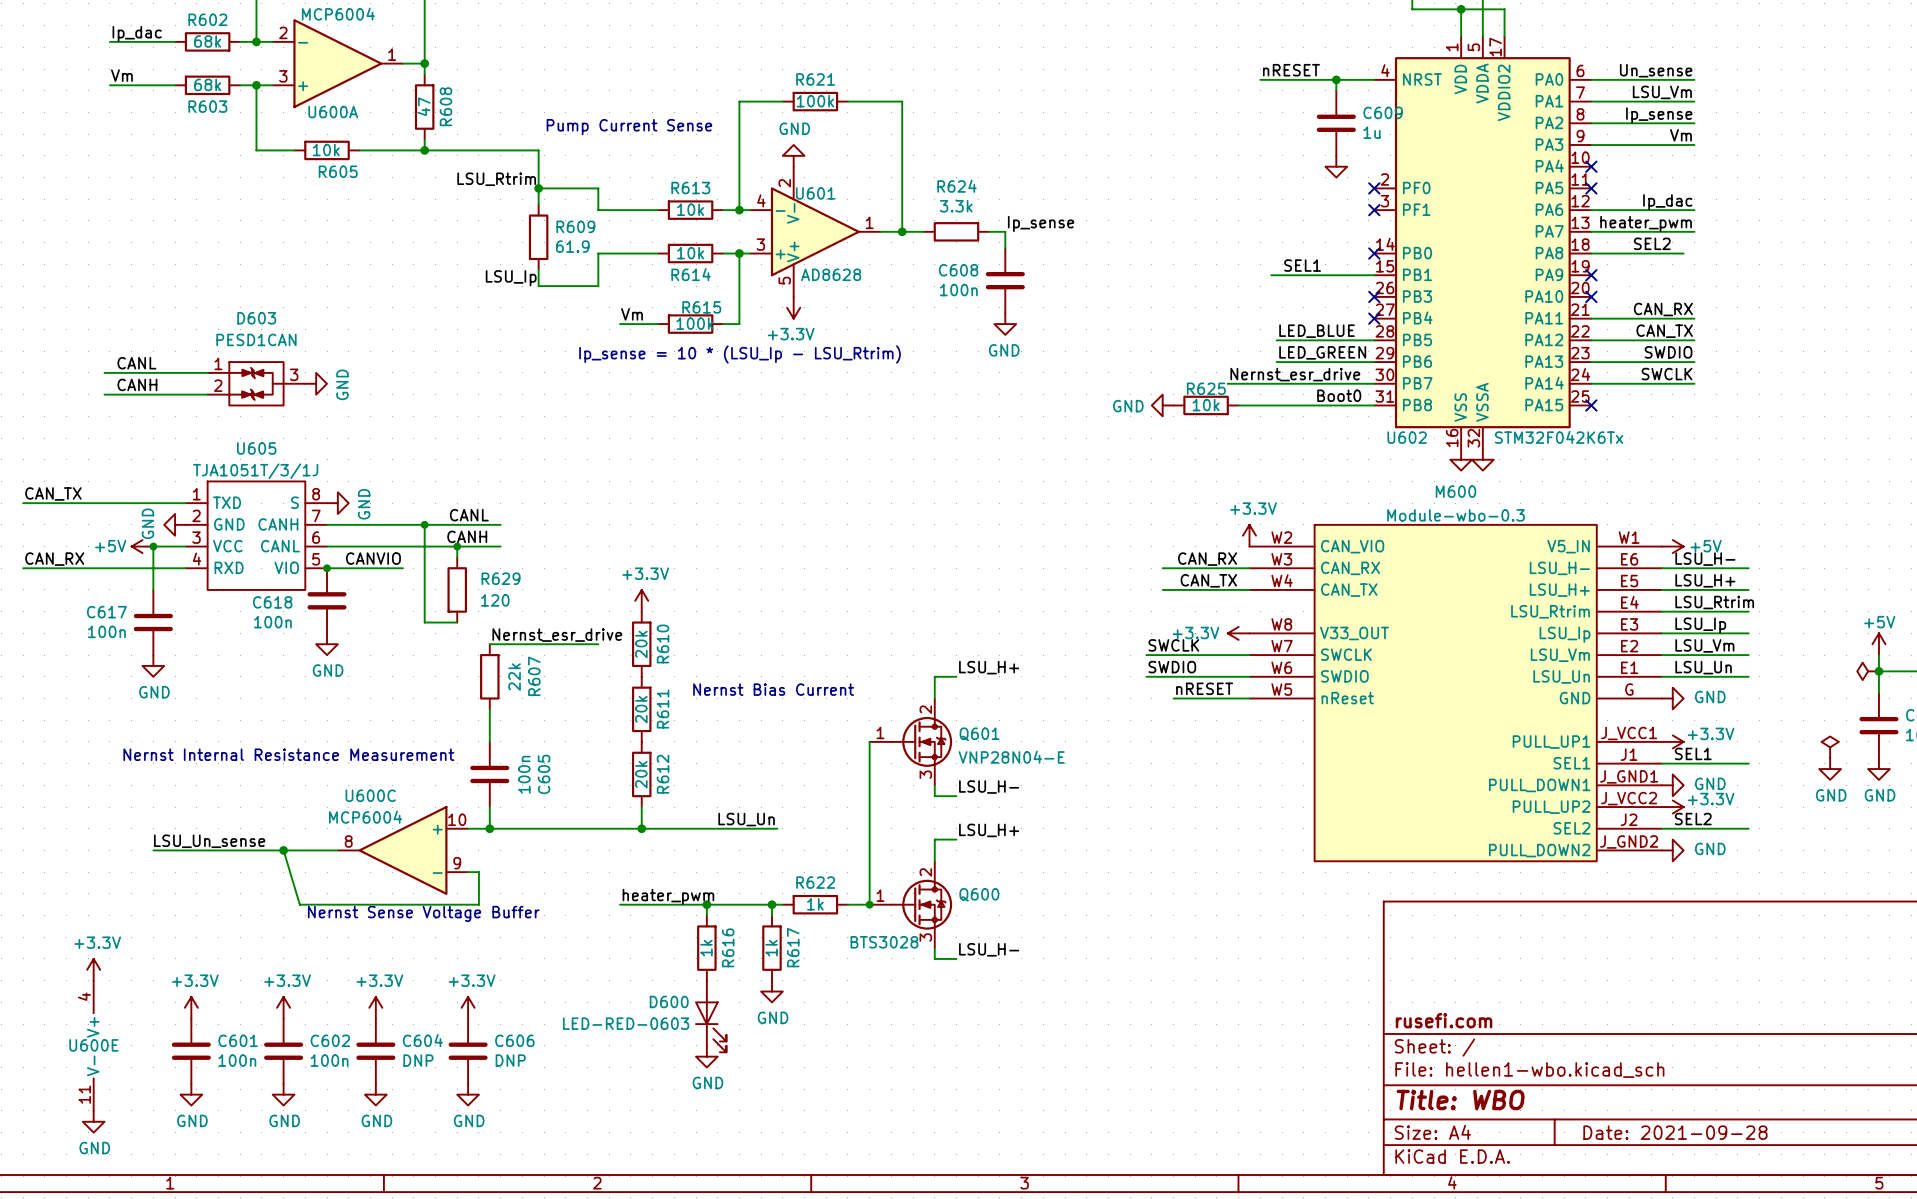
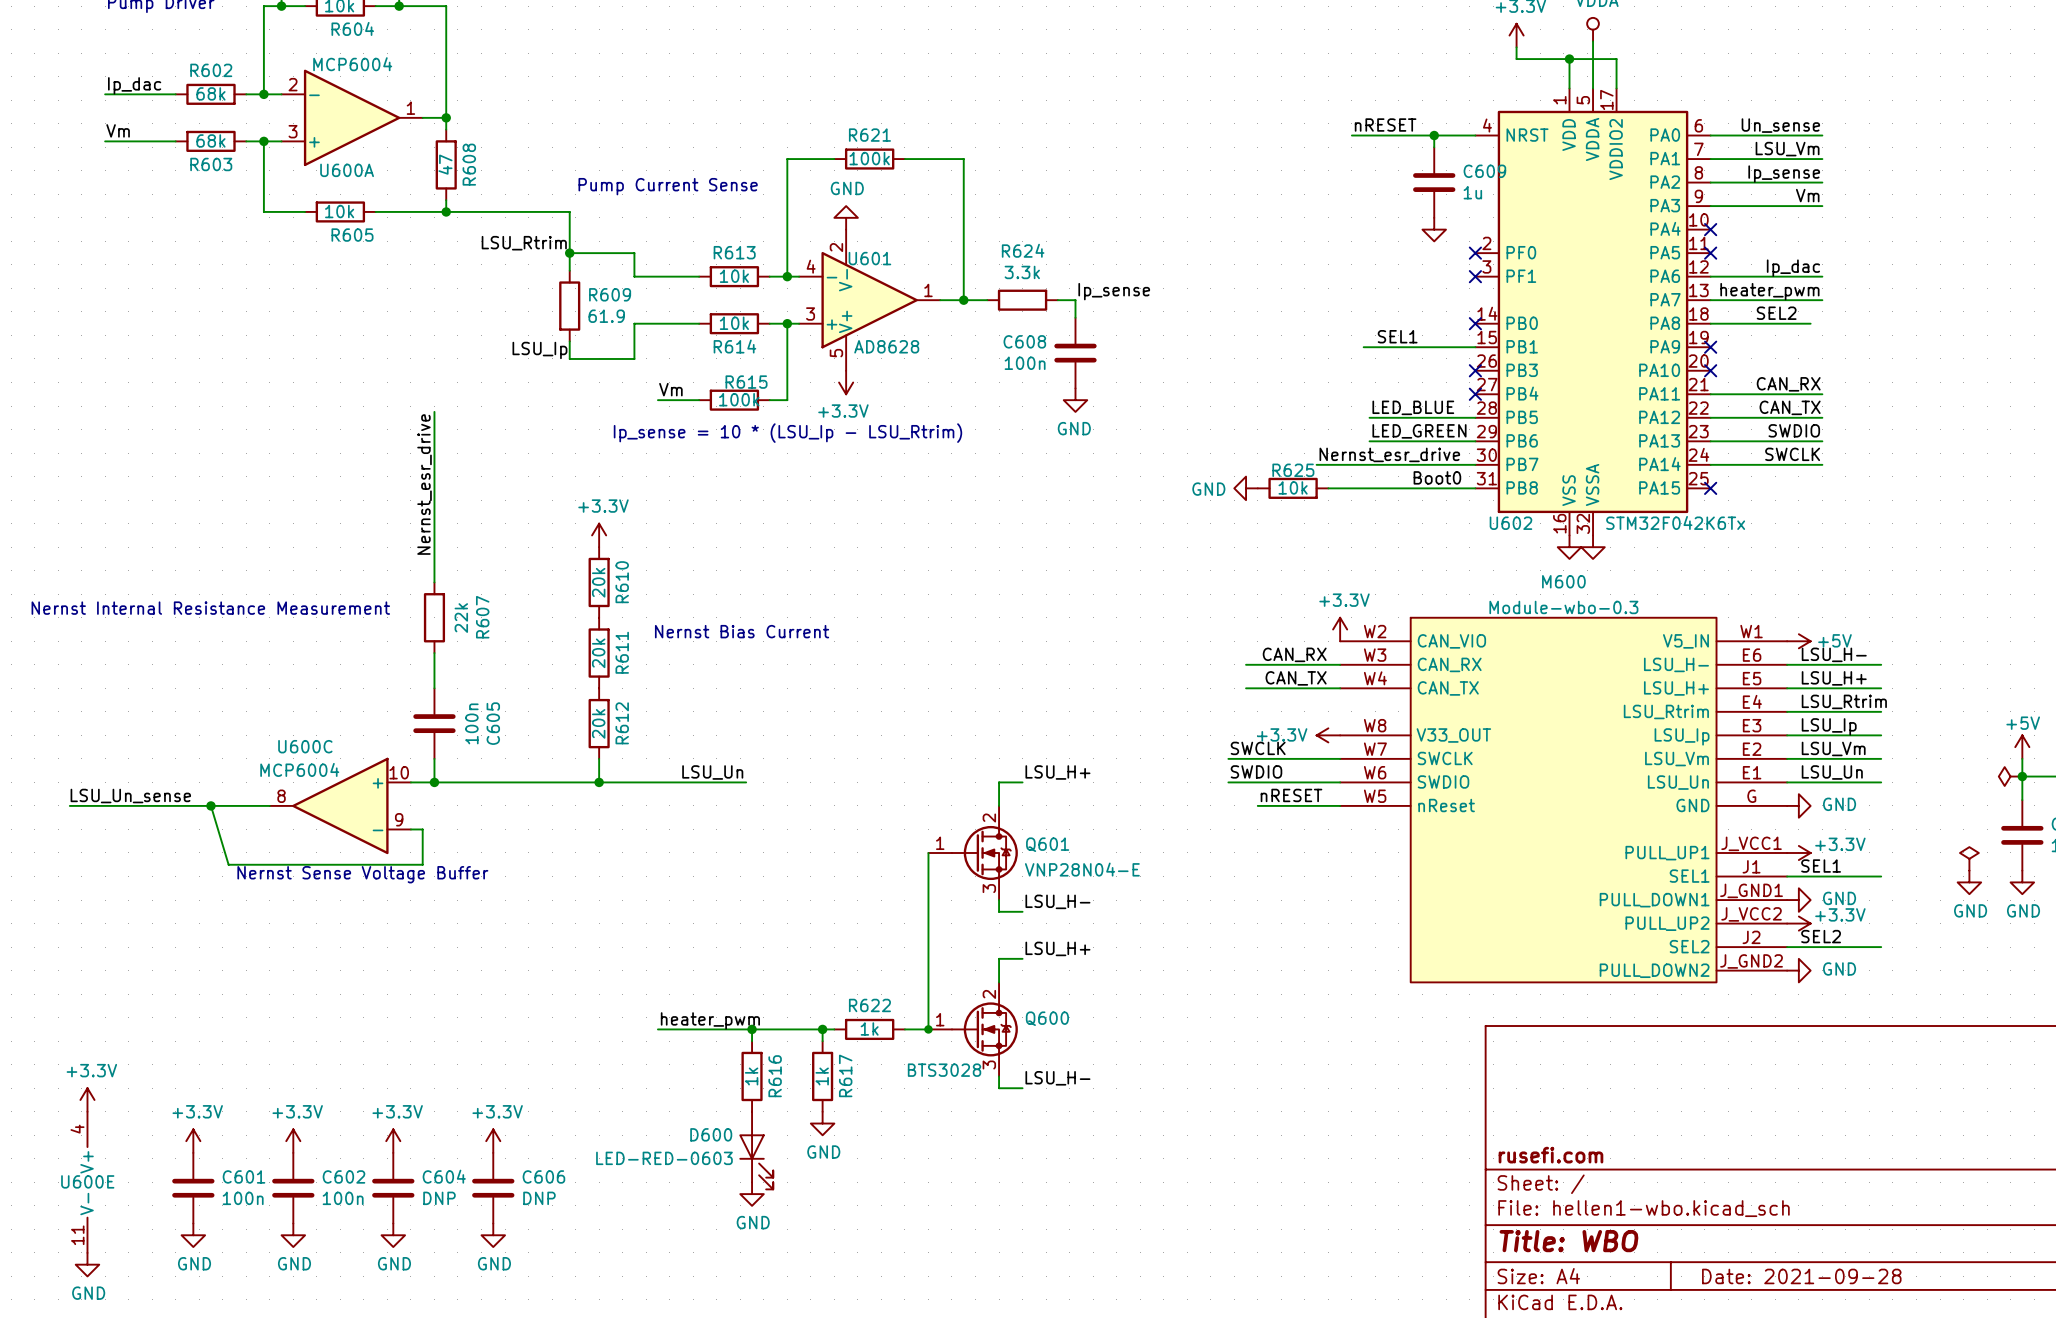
wire: none -> (434, 411) (434, 582)
label: CANL (136, 363) -> none
wire: (104, 372) (207, 372) -> none
D603: PESD1CAN (256, 383) -> none
power symbol: GND (316, 383) -> none
label: CANH (137, 384) -> none
wire: (104, 394) (207, 394) -> none
label: none -> Nernst_esr_drive (424, 484)
label: CAN_TX (53, 493) -> none
wire: (23, 503) (185, 503) -> none
power symbol: GND (337, 503) -> none
text: none -> Nernst Internal Resistance Measurement (210, 608)
label: CANL (469, 515) -> none
power symbol: GND (175, 524) -> none
wire: (327, 524) (500, 524) -> none
wire: (424, 524) (424, 622) (457, 622) -> none
junction: (424, 524) -> none
U605: TJA1051T/3/1J (256, 535) -> none
label: CANH (467, 536) -> none
power symbol: +5V (142, 546) -> none
junction: (153, 546) -> none
wire: (185, 546) (153, 546) (153, 589) -> none
wire: (327, 546) (500, 546) -> none
wire: (457, 546) (457, 557) -> none
junction: (457, 546) -> none
label: CANVIO (373, 558) -> none
label: CAN_RX (54, 559) -> none
wire: (23, 568) (185, 568) -> none
wire: (327, 568) (402, 568) -> none
junction: (327, 568) -> none
R629: 120 (457, 589) -> none
C618: 100n (327, 600) -> none
power symbol position: +3.3V (641, 600) -> +3.3V (599, 535)
C617: 100n (153, 622) -> none
label: Nernst_esr_drive (557, 635) -> none
power symbol: GND (327, 644) -> none
wire: (489, 644) (598, 644) -> none
R610 position: (641, 644) -> (599, 582)
power symbol: GND (153, 665) -> none
junction: none -> (434, 782)
R607 position: (489, 676) -> (434, 617)
junction: none -> (599, 782)
text position: Nernst Bias Current (773, 689) -> Nernst Bias Current (742, 631)
junction: none -> (210, 805)
wire: (489, 709) (489, 741) -> (434, 653) (434, 688)
R611 position: (641, 709) -> (599, 653)
text: Nernst Internal Resistance Measurement (288, 754) -> none
C605 position: (489, 774) -> (434, 723)
R612 position: (641, 774) -> (599, 723)
wire: (489, 807) (489, 828) -> (434, 758) (434, 782)
wire: (641, 807) (641, 828) -> (599, 758) (599, 782)
label position: LSU_Un (746, 819) -> LSU_Un (712, 772)
wire: (468, 828) (777, 828) -> (410, 782) (746, 782)
junction: (489, 828) -> none
junction: (641, 828) -> none
label position: LSU_Un_sense (209, 841) -> LSU_Un_sense (130, 796)
wire: (153, 850) (337, 850) -> (69, 805) (269, 805)
wire: (283, 850) (299, 904) (478, 904) (478, 872) (468, 872) -> (210, 805) (228, 864) (422, 864) (422, 829) (410, 829)
junction: (283, 850) -> none
U600C position: (402, 850) -> (340, 805)
text position: Nernst Sense Voltage Buffer (423, 913) -> Nernst Sense Voltage Buffer (362, 874)

